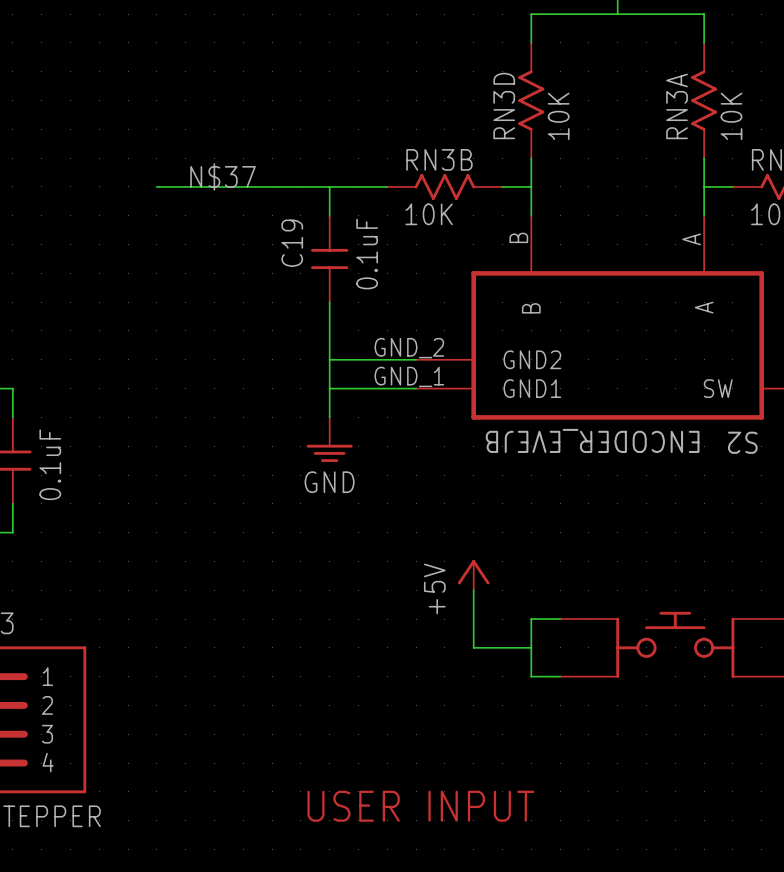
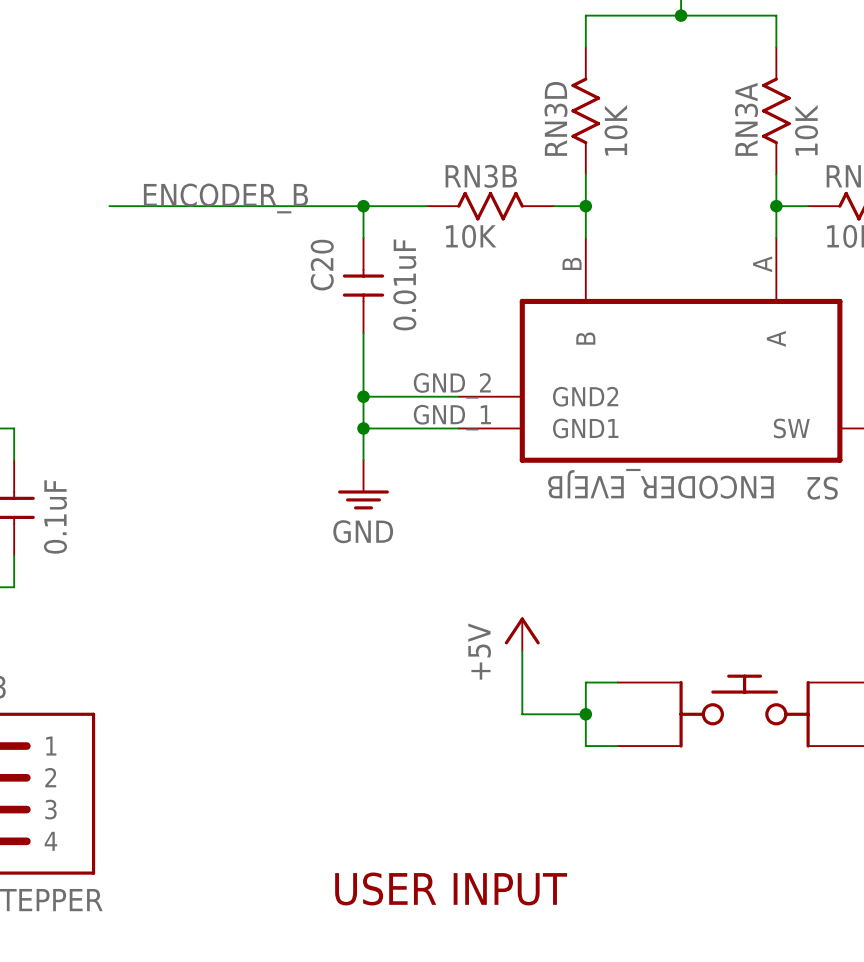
junction: none -> (681, 15)
label: N$37 (223, 176) -> none
label: none -> ENCODER_B (225, 198)
wire: none -> (109, 206) (172, 206)
junction: none -> (363, 206)
junction: none -> (585, 206)
junction: none -> (776, 206)
C19 name: C19 (292, 243) -> C20 (322, 265)
C19 value: 0.1uF (367, 254) -> 0.01uF (404, 284)
junction: none -> (363, 396)
junction: none -> (363, 428)
junction: none -> (585, 714)

